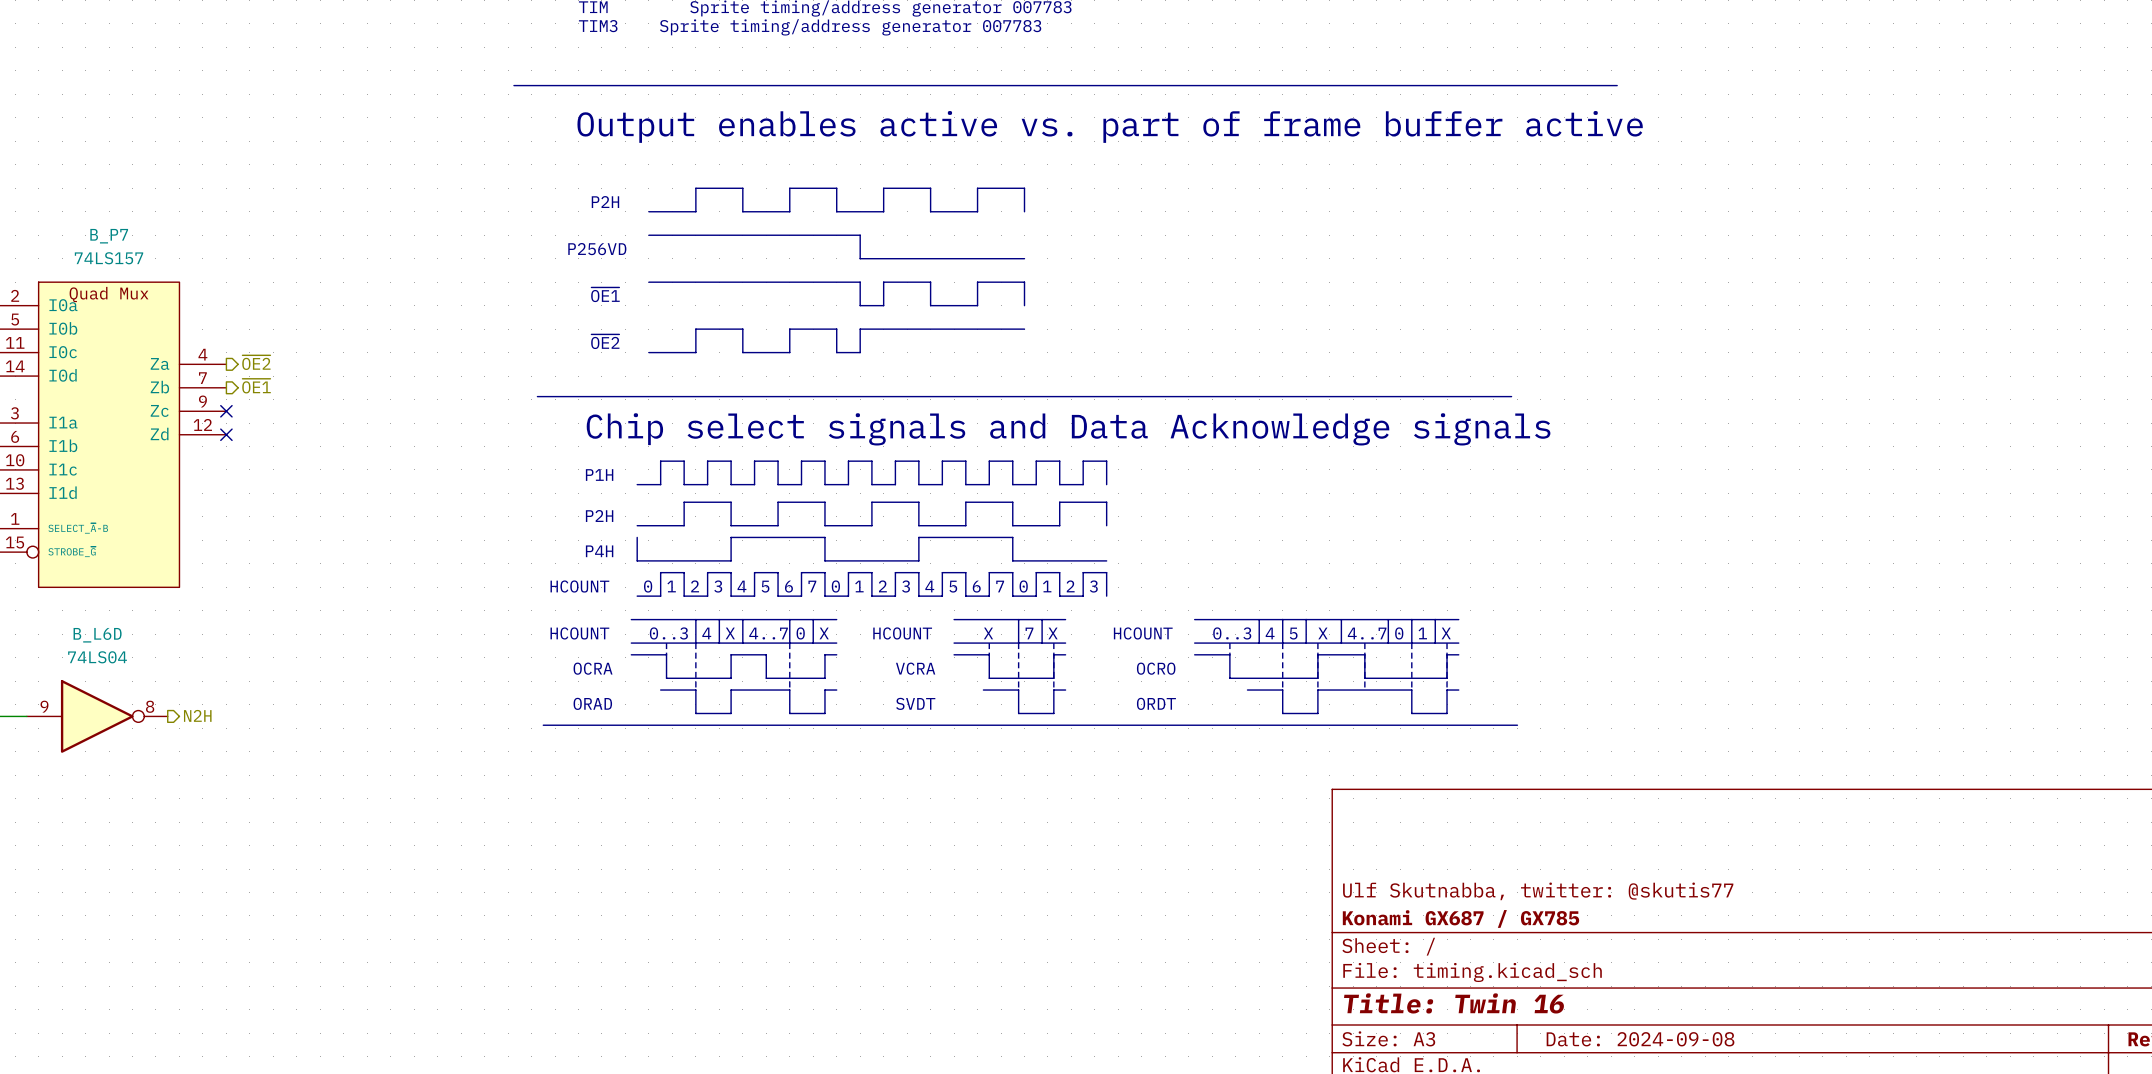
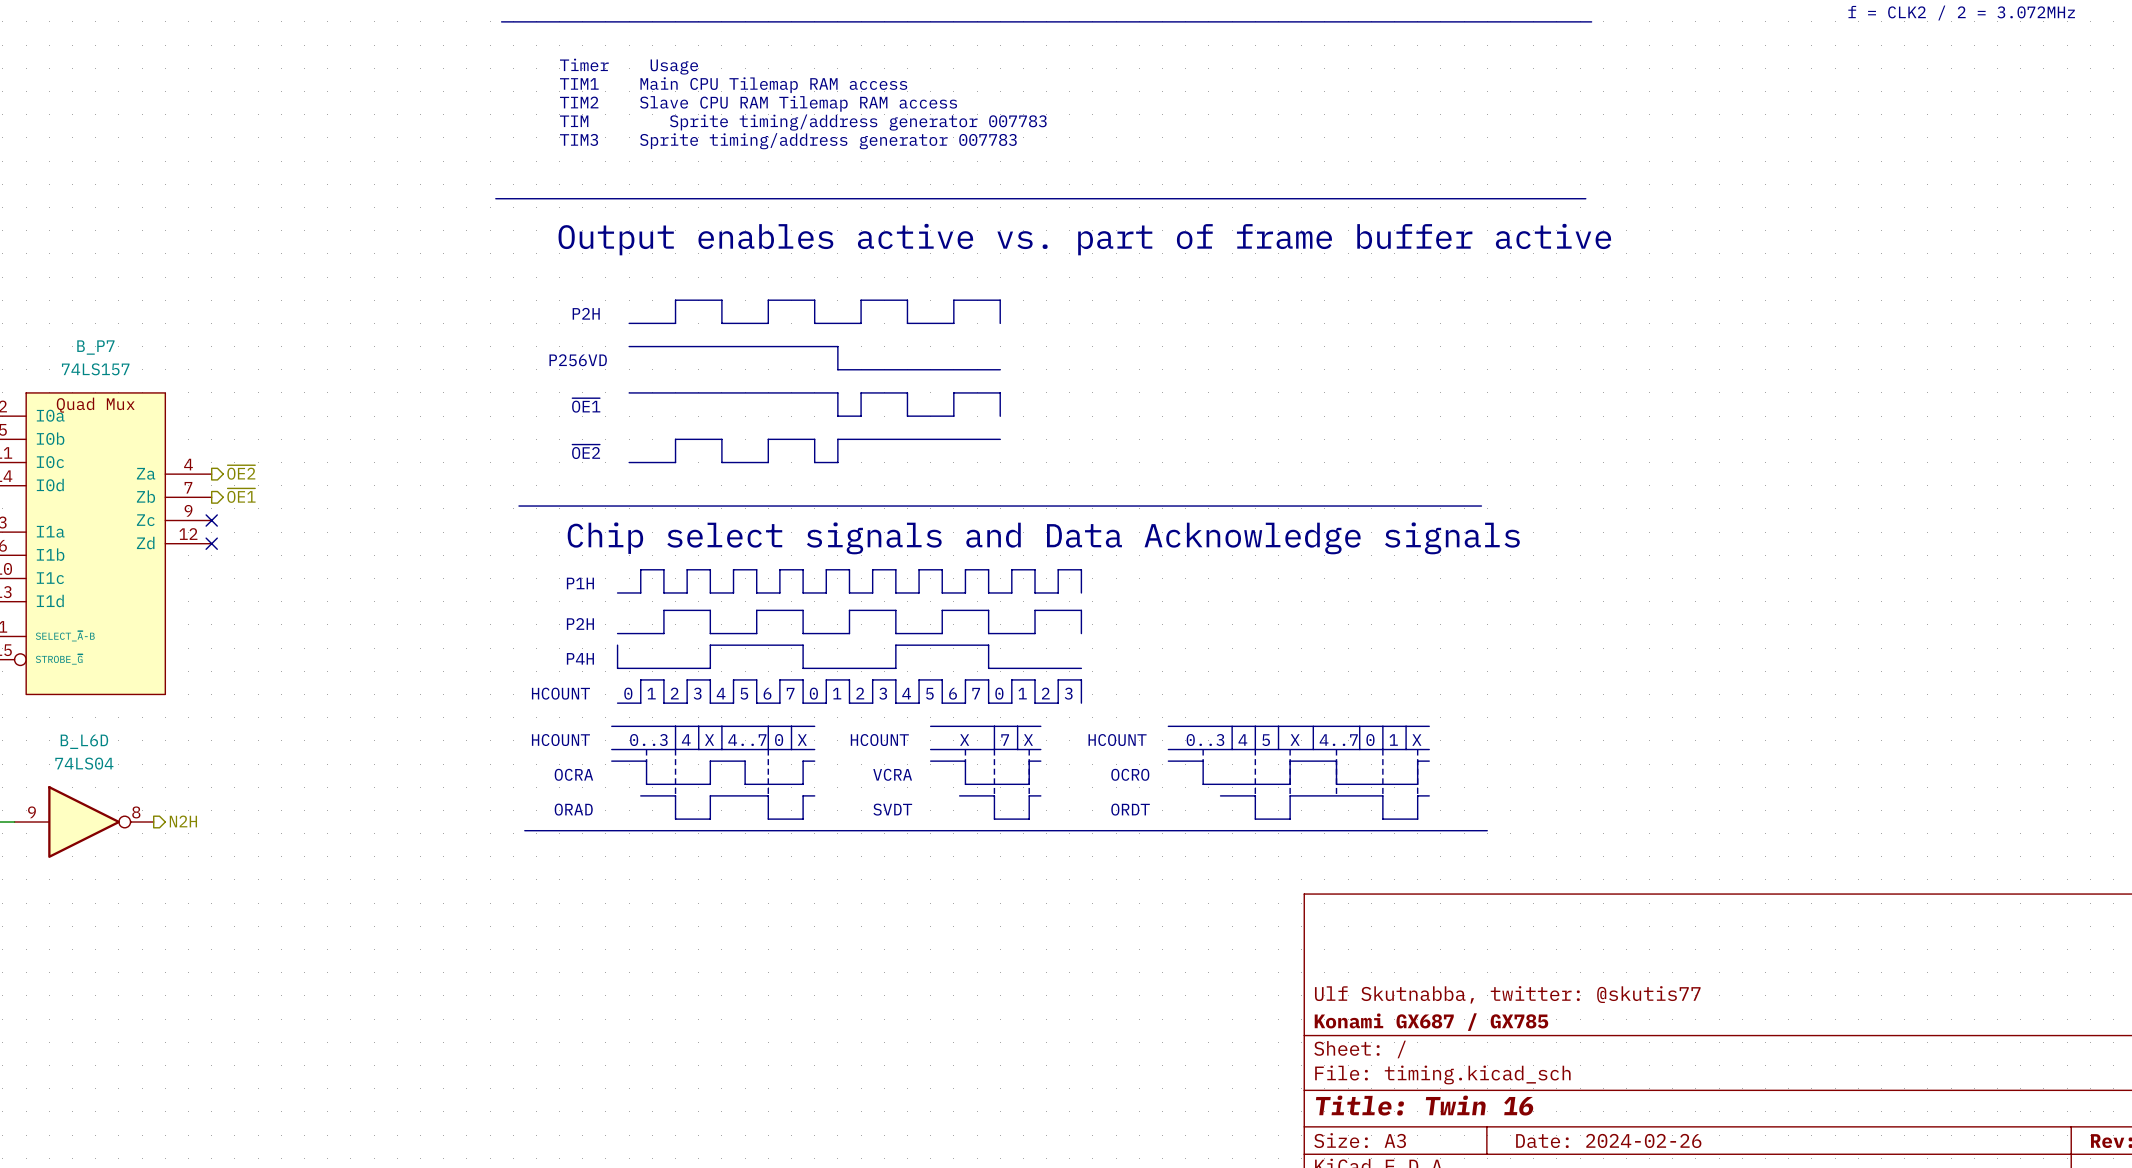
title block: Date: 2024-09-08 (1640, 1039) -> Date: 2024-02-26 (1608, 1140)

